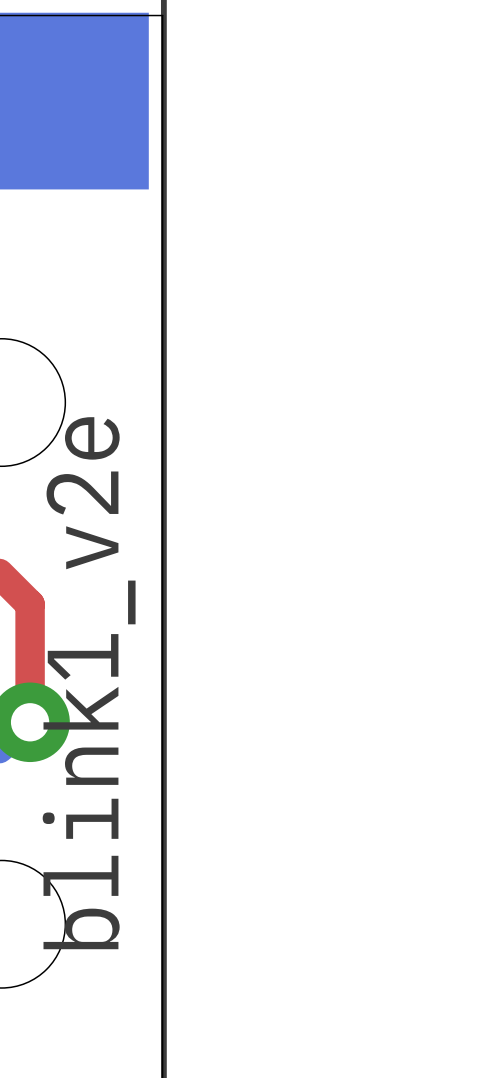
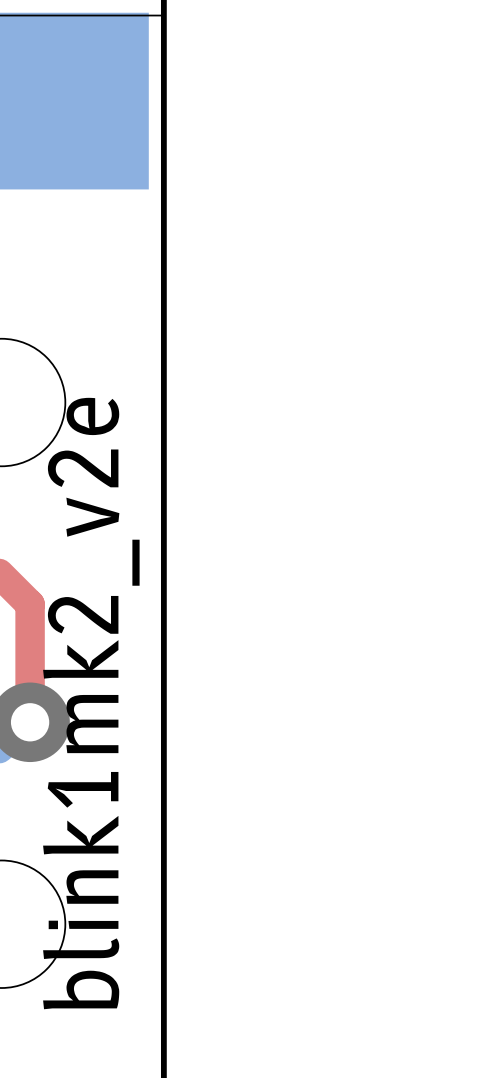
text: blink1_v2e (89, 683) -> blink1mk2_v2e (91, 703)

